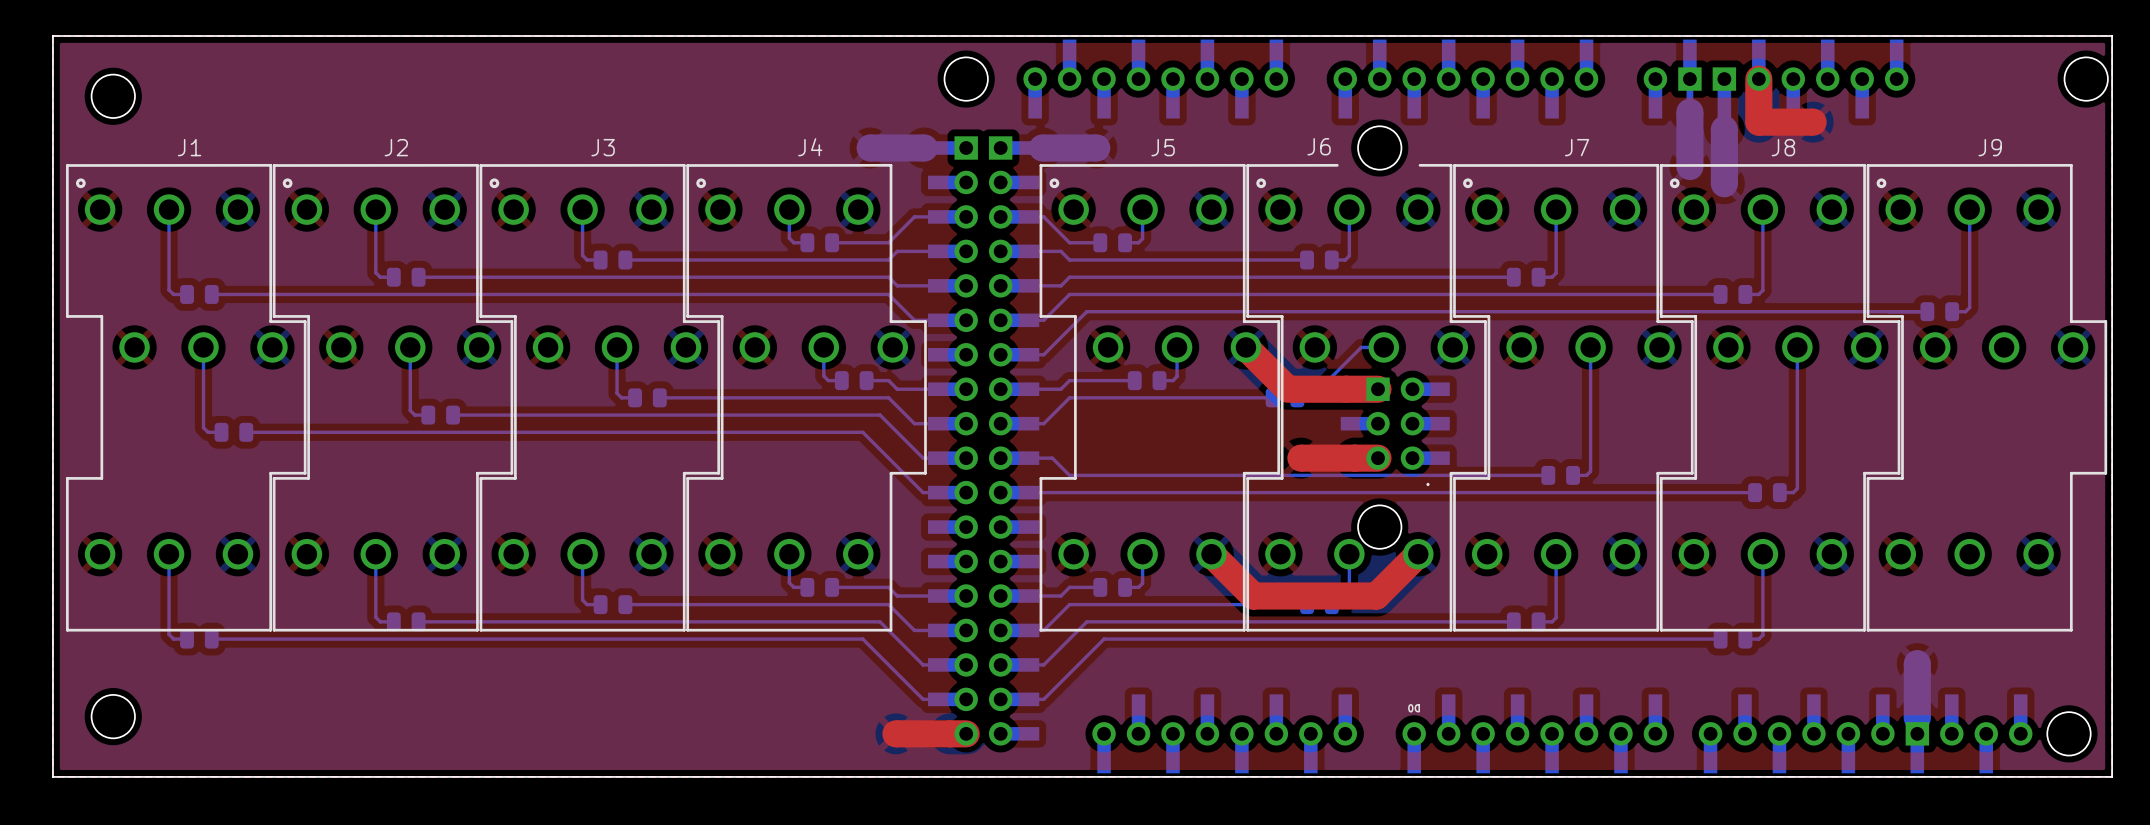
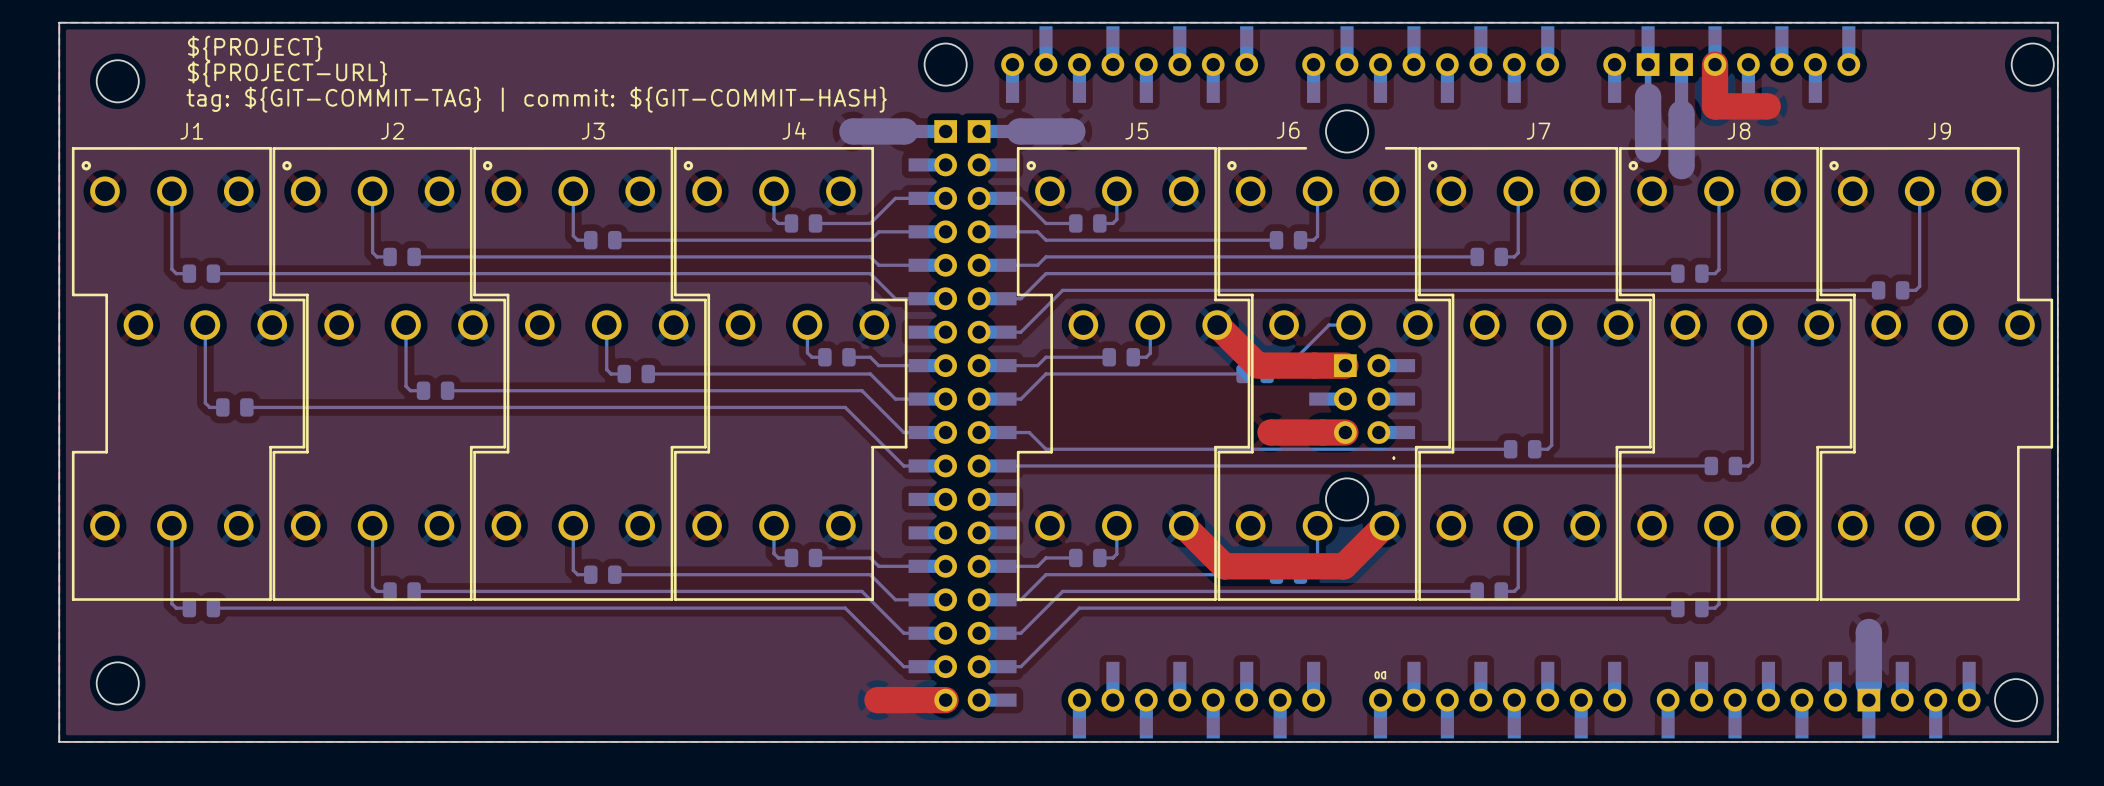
text: none -> ${PROJECT} (255, 48)
text: none -> ${PROJECT-URL} (287, 74)
text: none -> tag: ${GIT-COMMIT-TAG} | commit: ${GIT-COMMIT-HASH} (536, 99)

